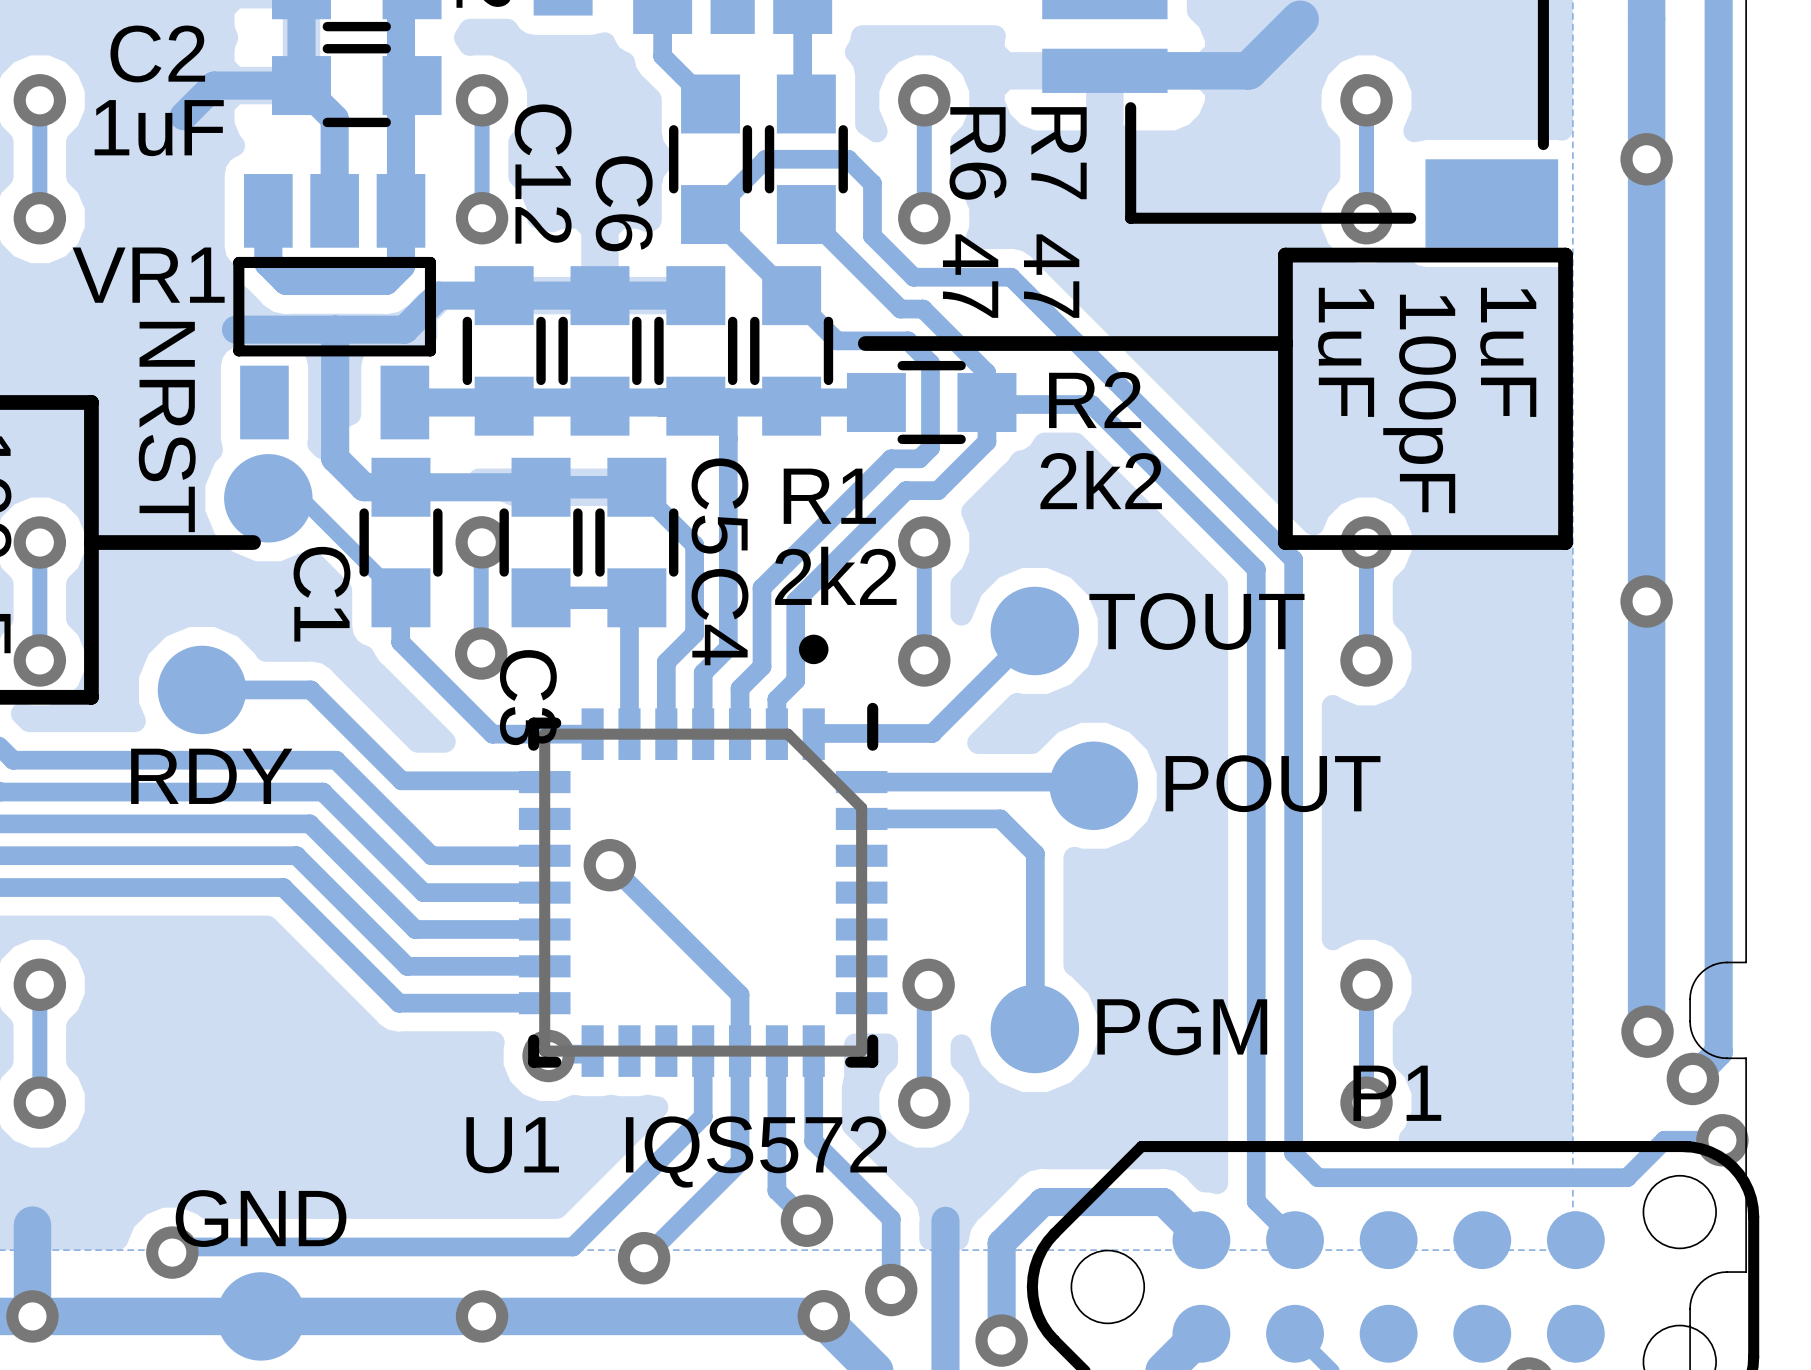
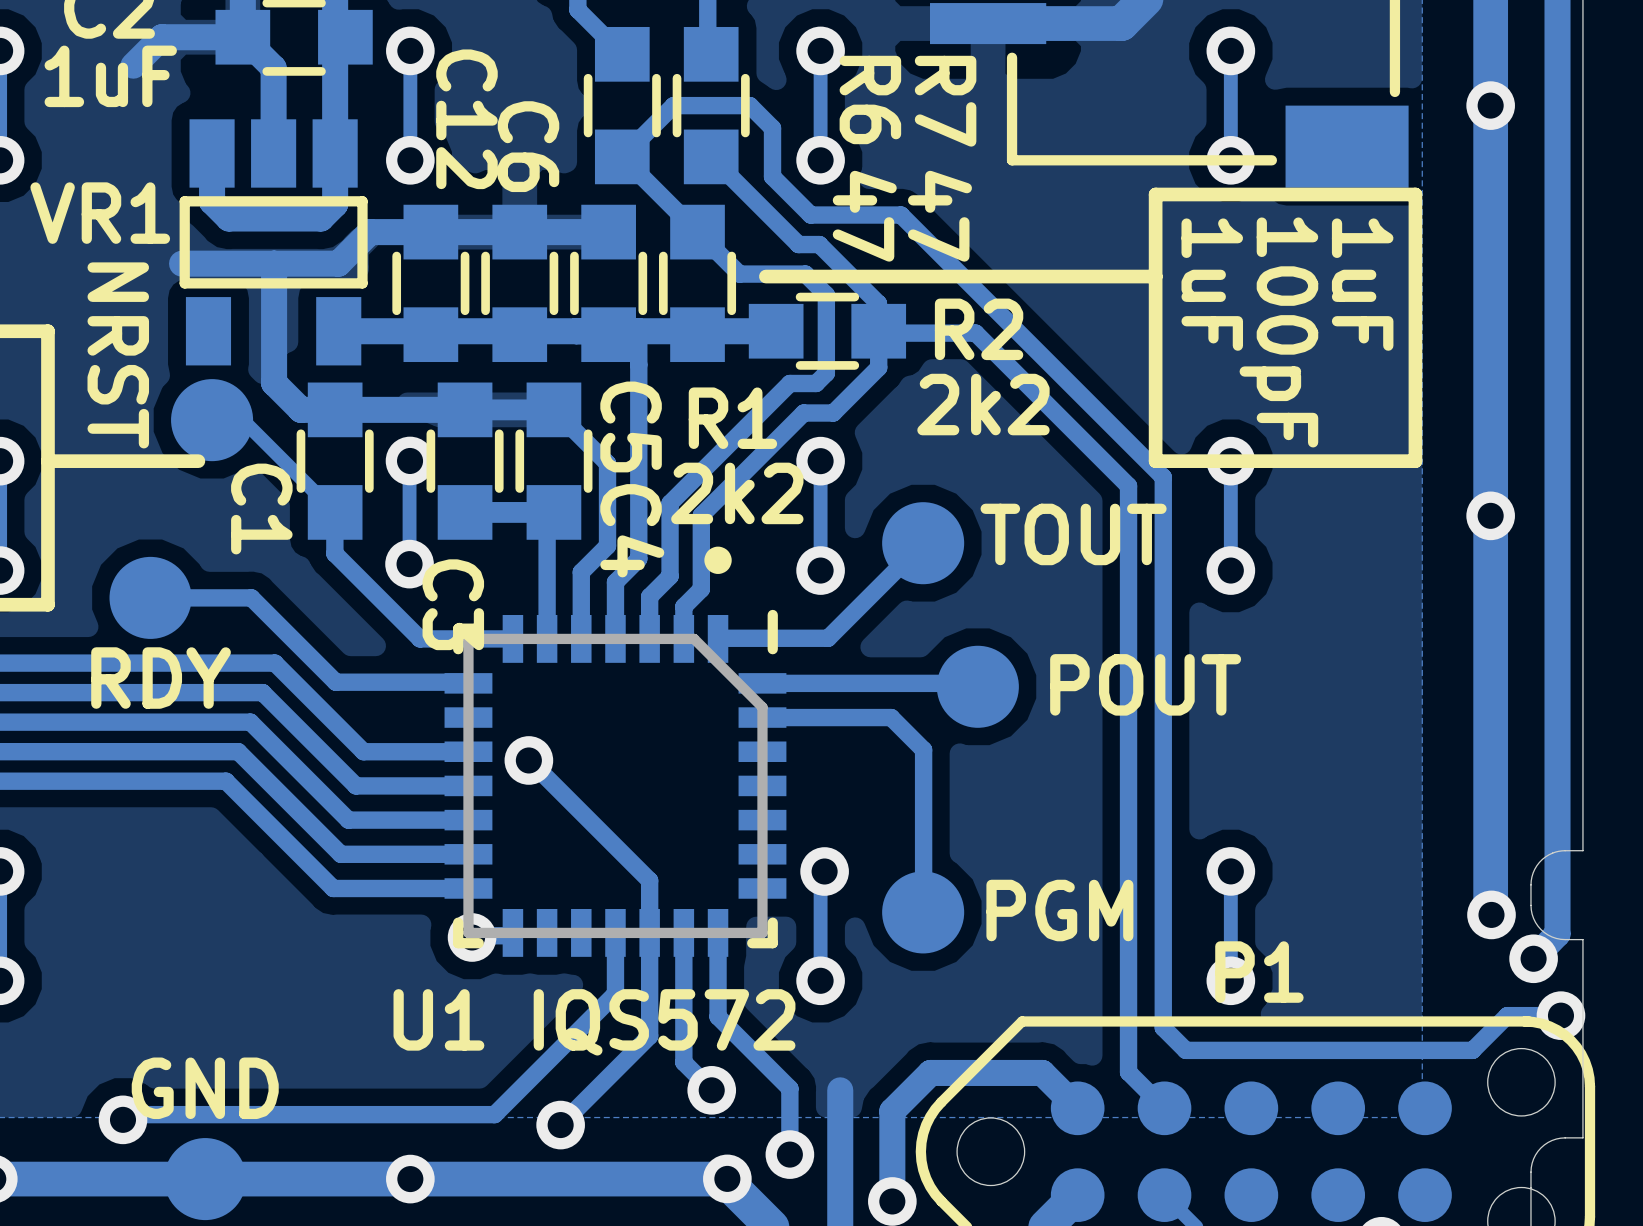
C6 name position: C6 (624, 203) -> C6 (528, 146)

